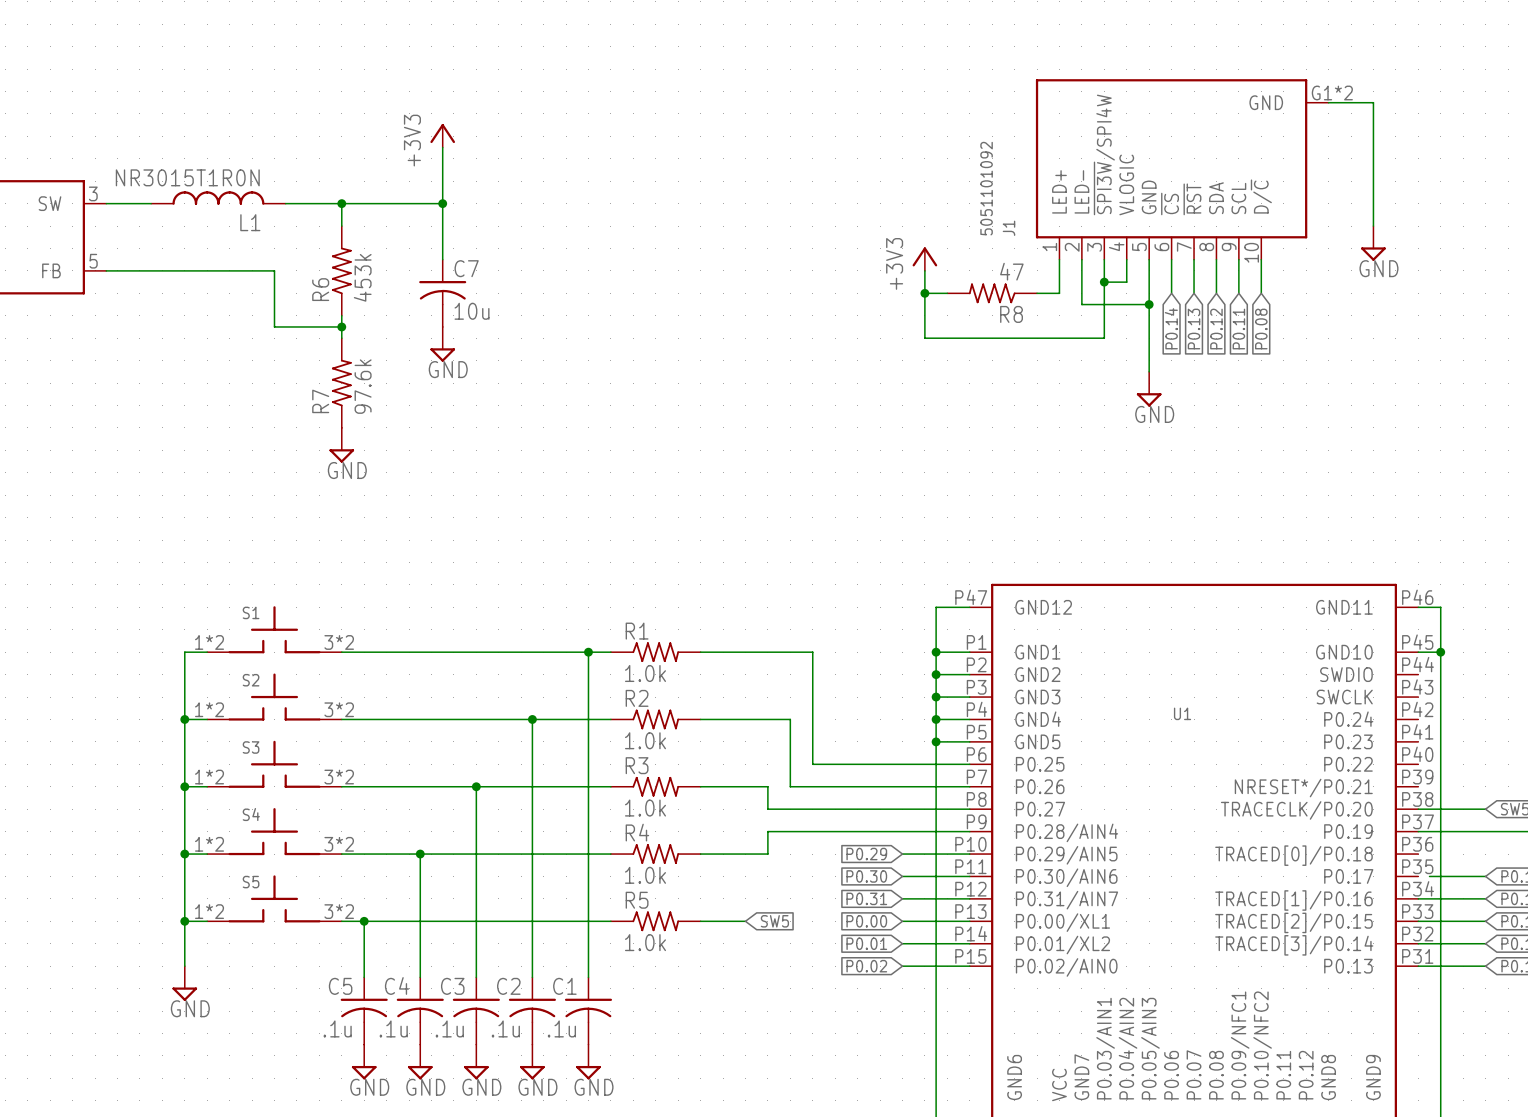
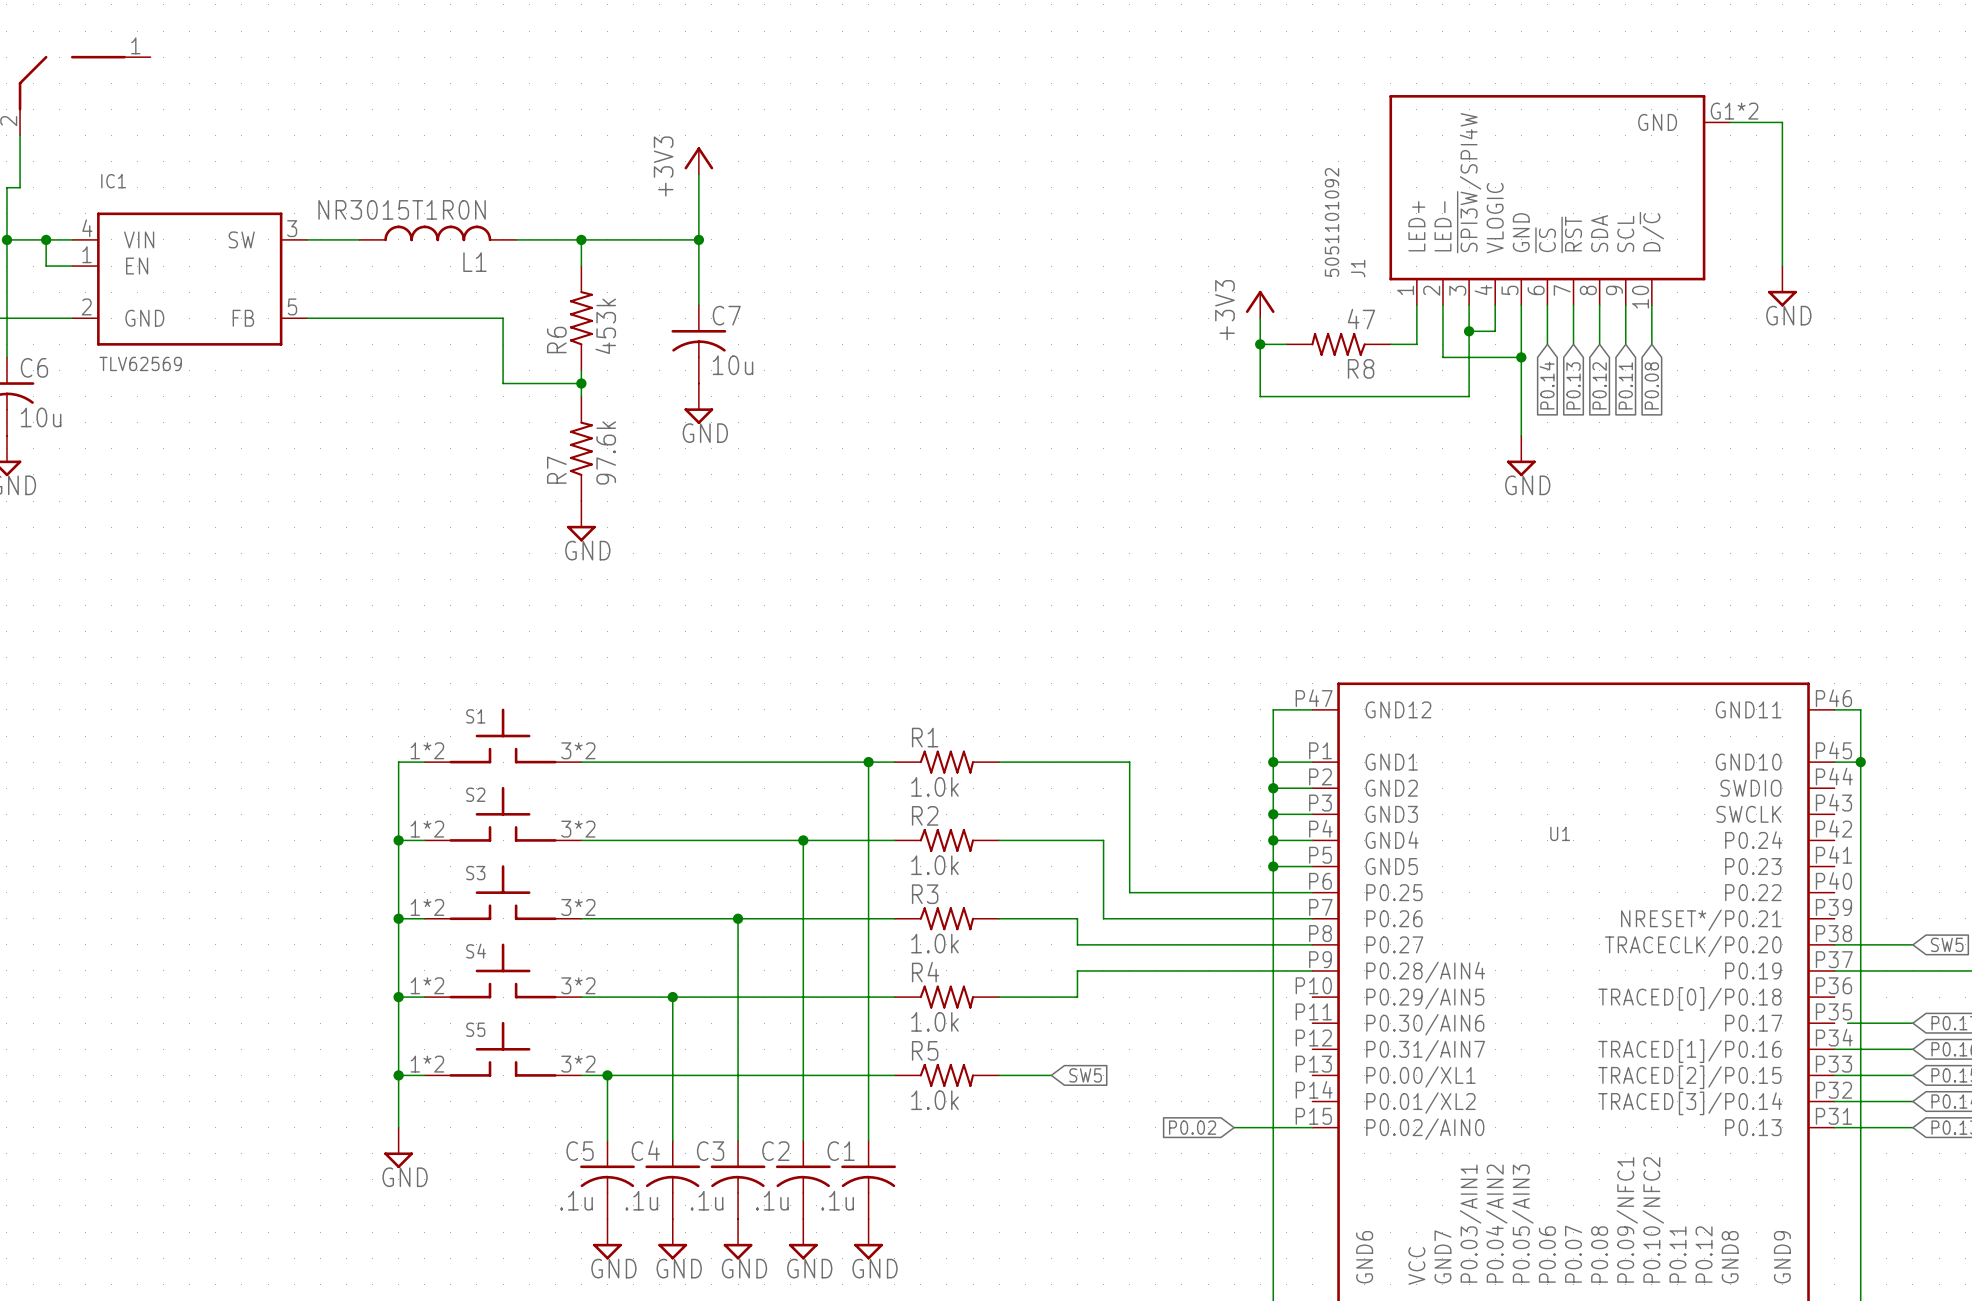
global label: P0.29 (866, 854) -> none
wire: (902, 854) (969, 854) -> none
global label: P0.30 (866, 876) -> none
wire: (902, 876) (969, 876) -> none
global label: P0.31 (866, 898) -> none
wire: (902, 898) (969, 898) -> none
global label: P0.00 (866, 921) -> none
wire: (902, 921) (969, 921) -> none
global label: P0.01 (866, 943) -> none
wire: (902, 943) (969, 943) -> none

